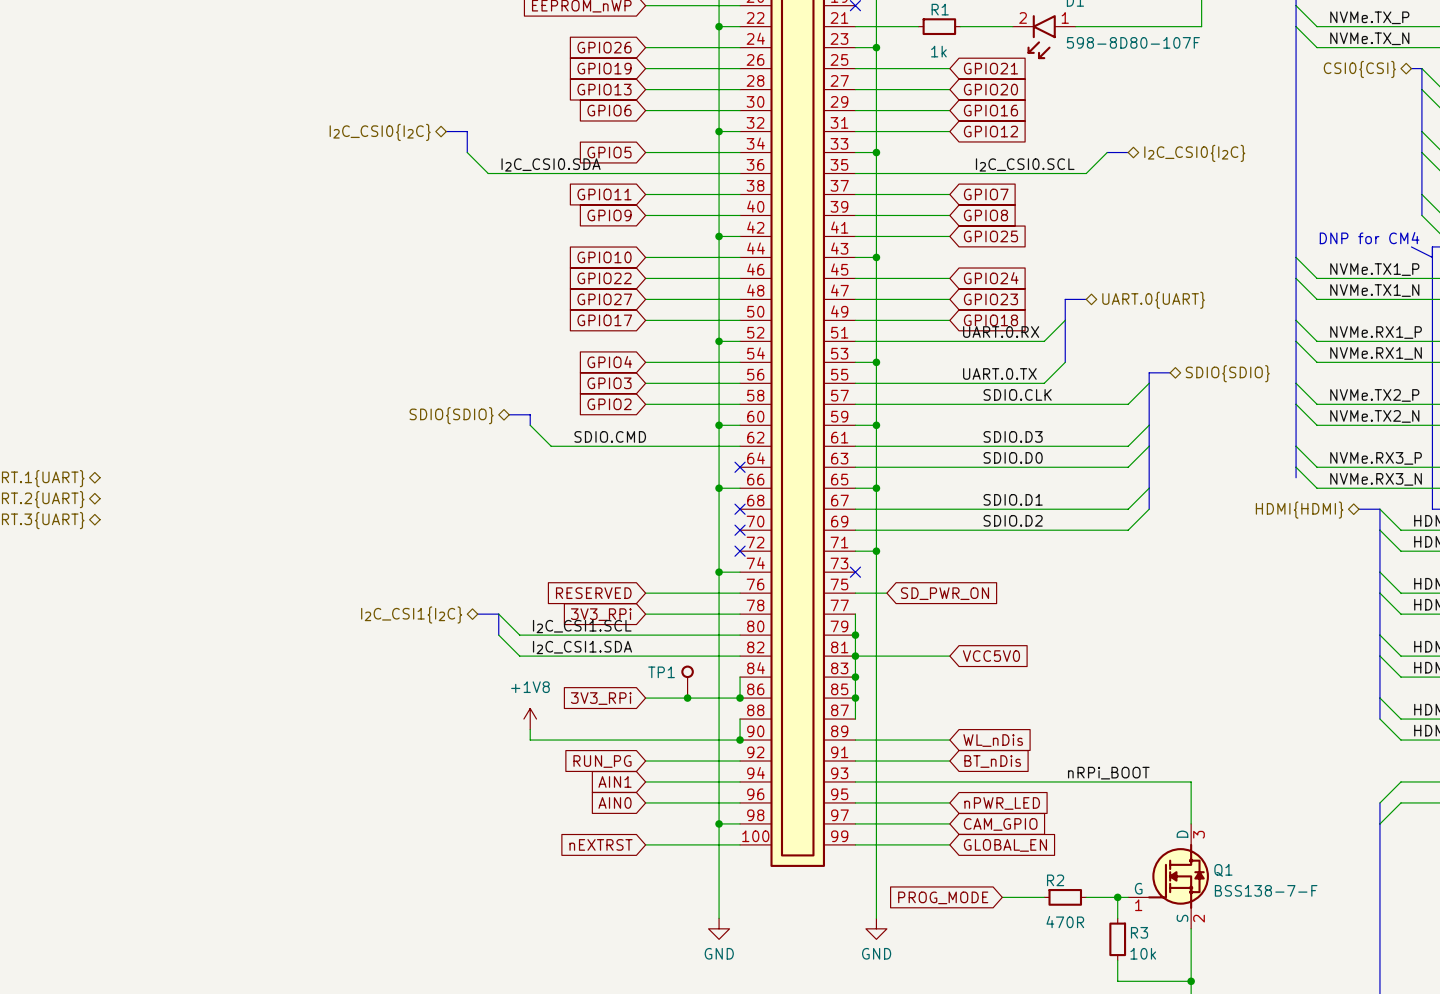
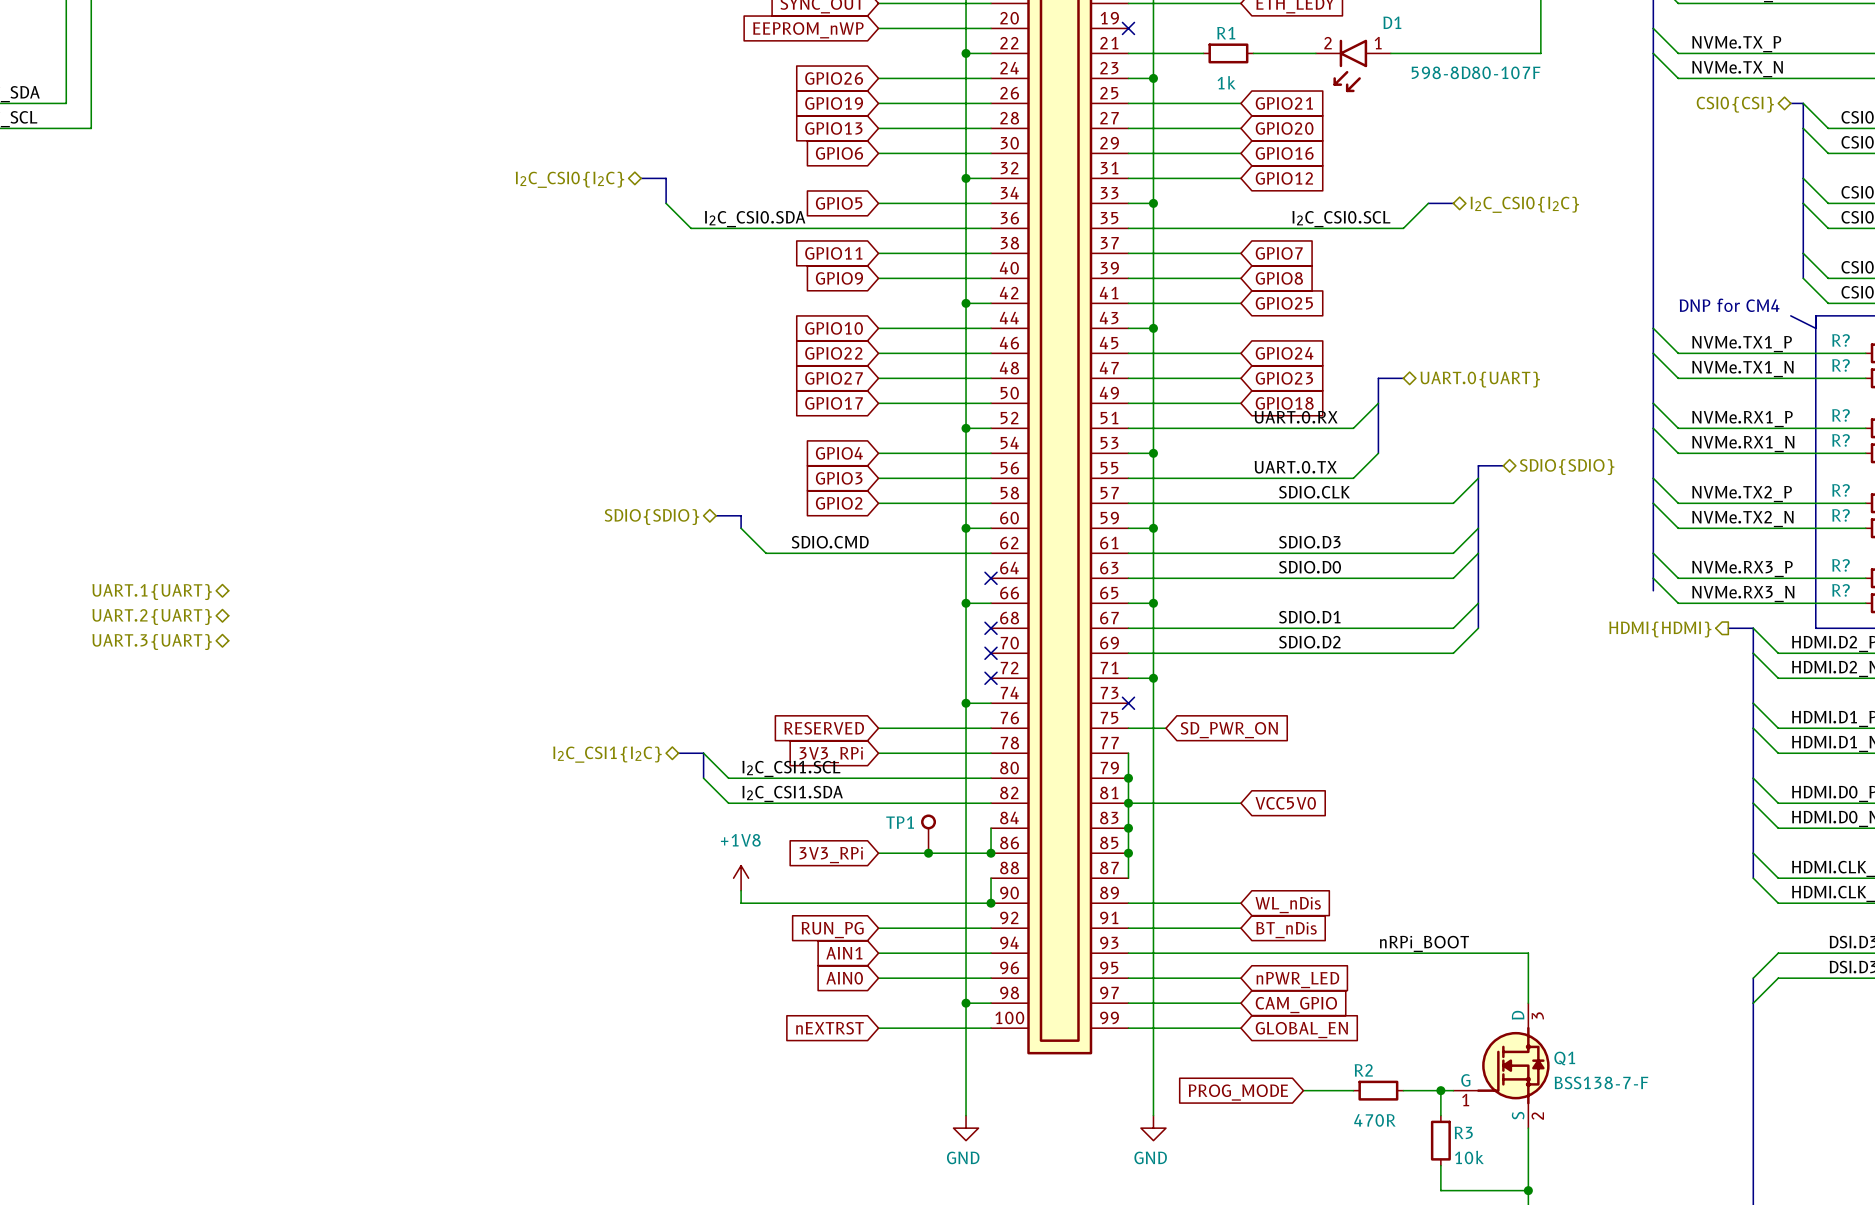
hierarchical label shape: bidirectional (1299, 510) -> output (1660, 629)

